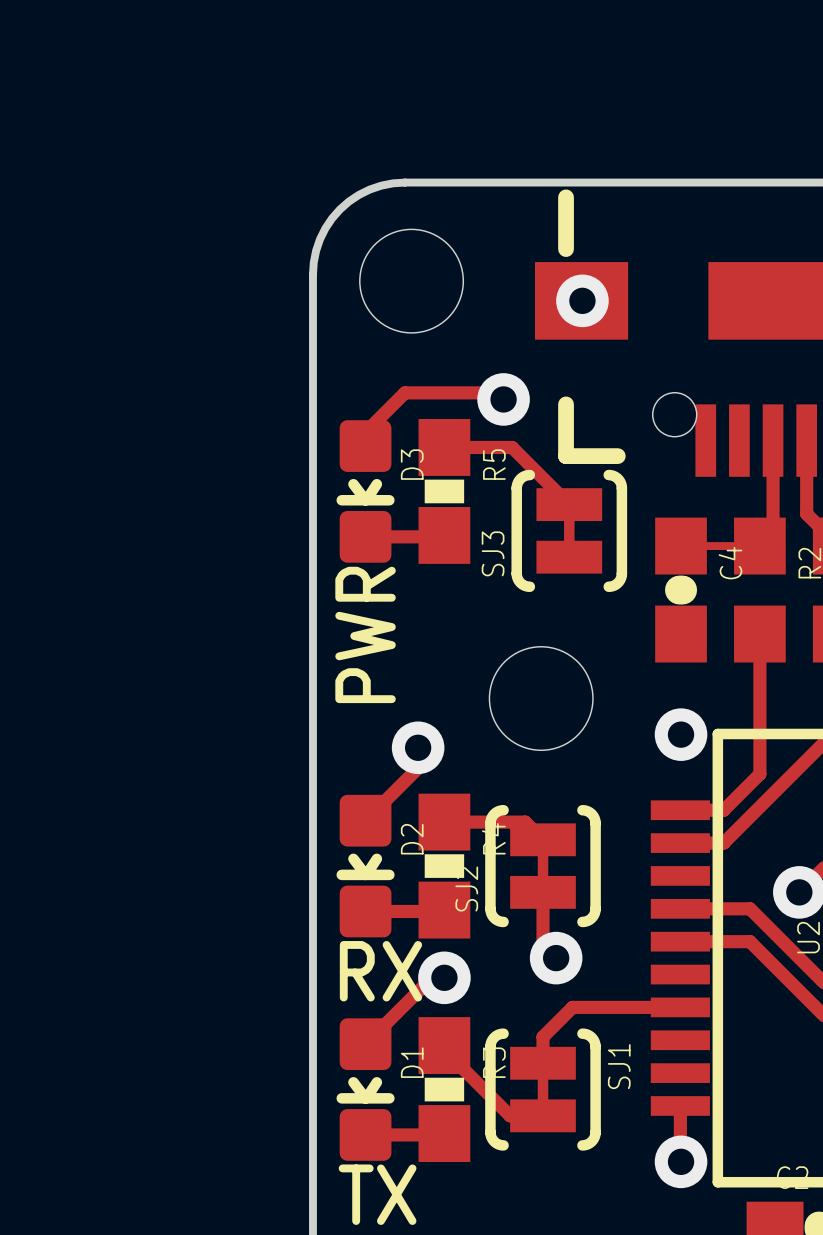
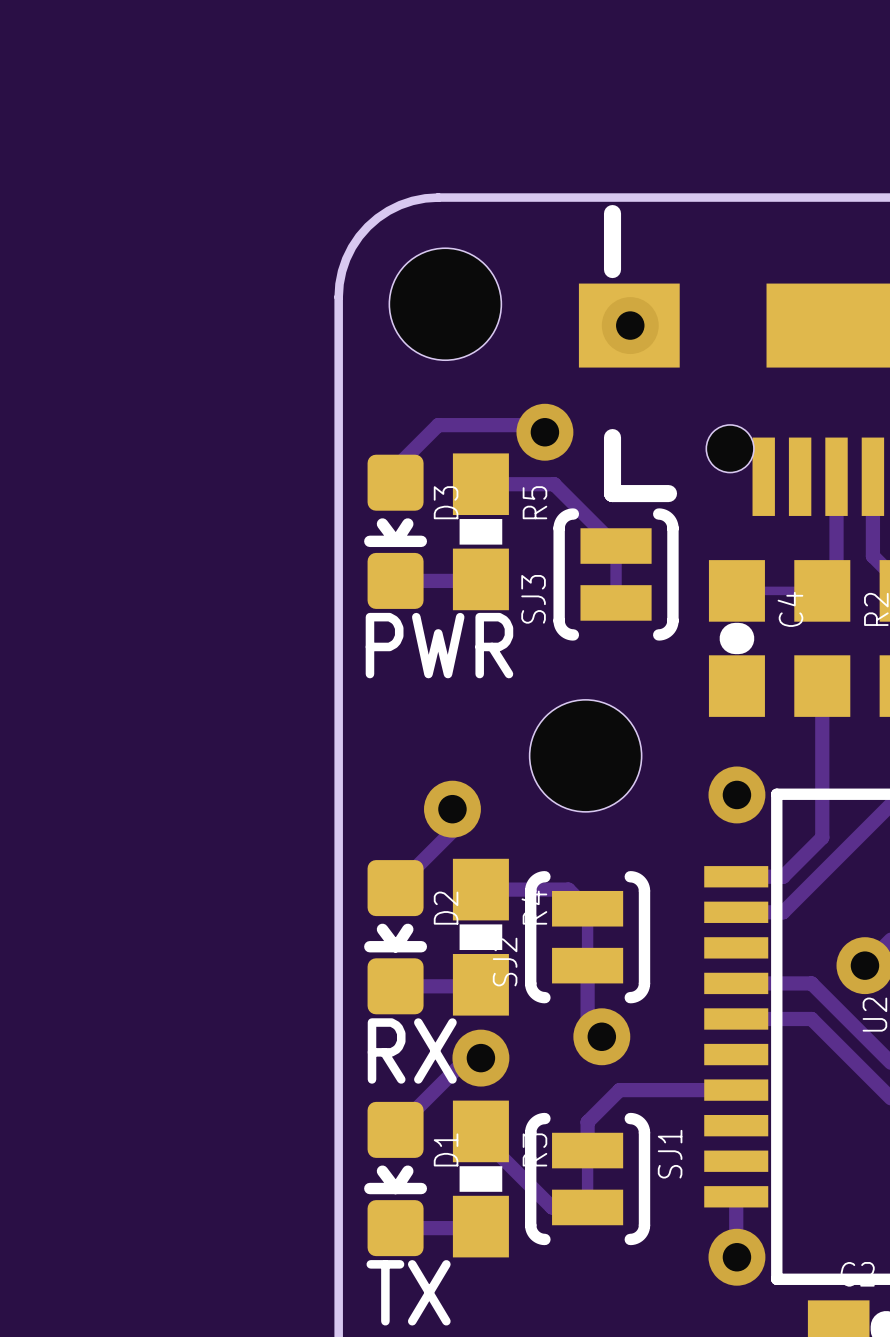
text rotation: 0° (365, 634) -> 90° clockwise (439, 645)

